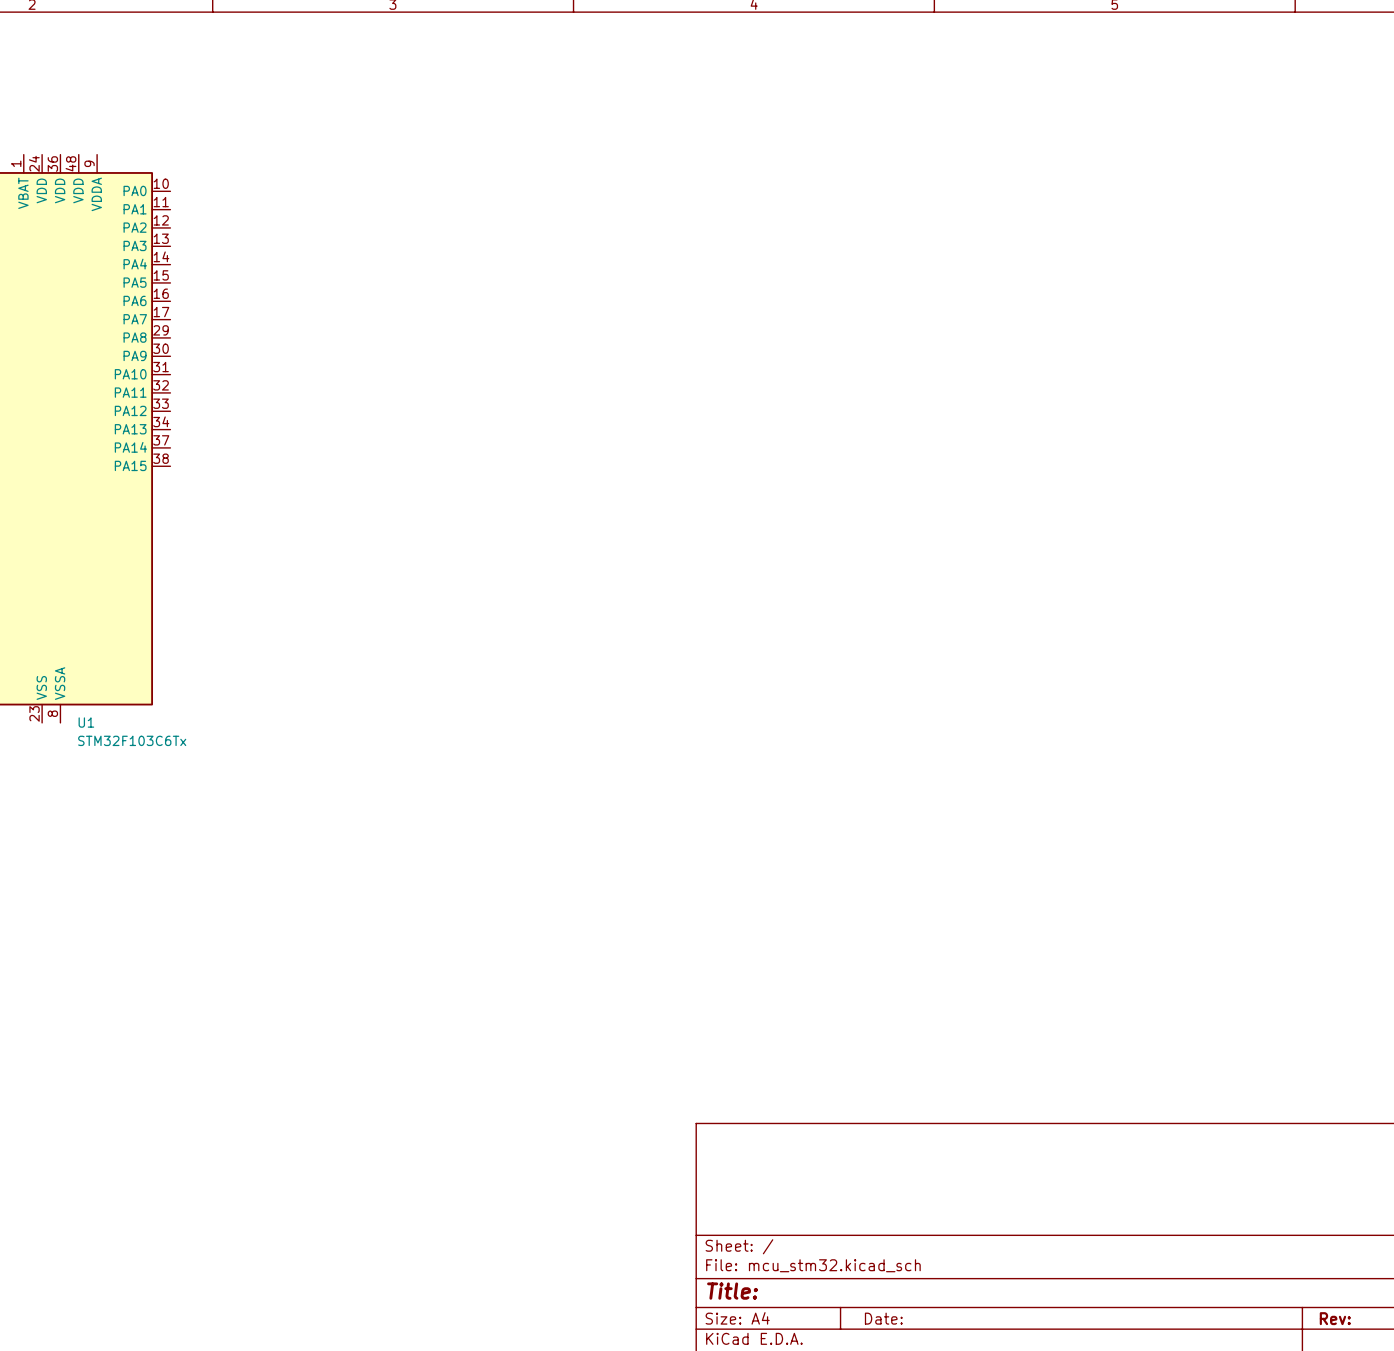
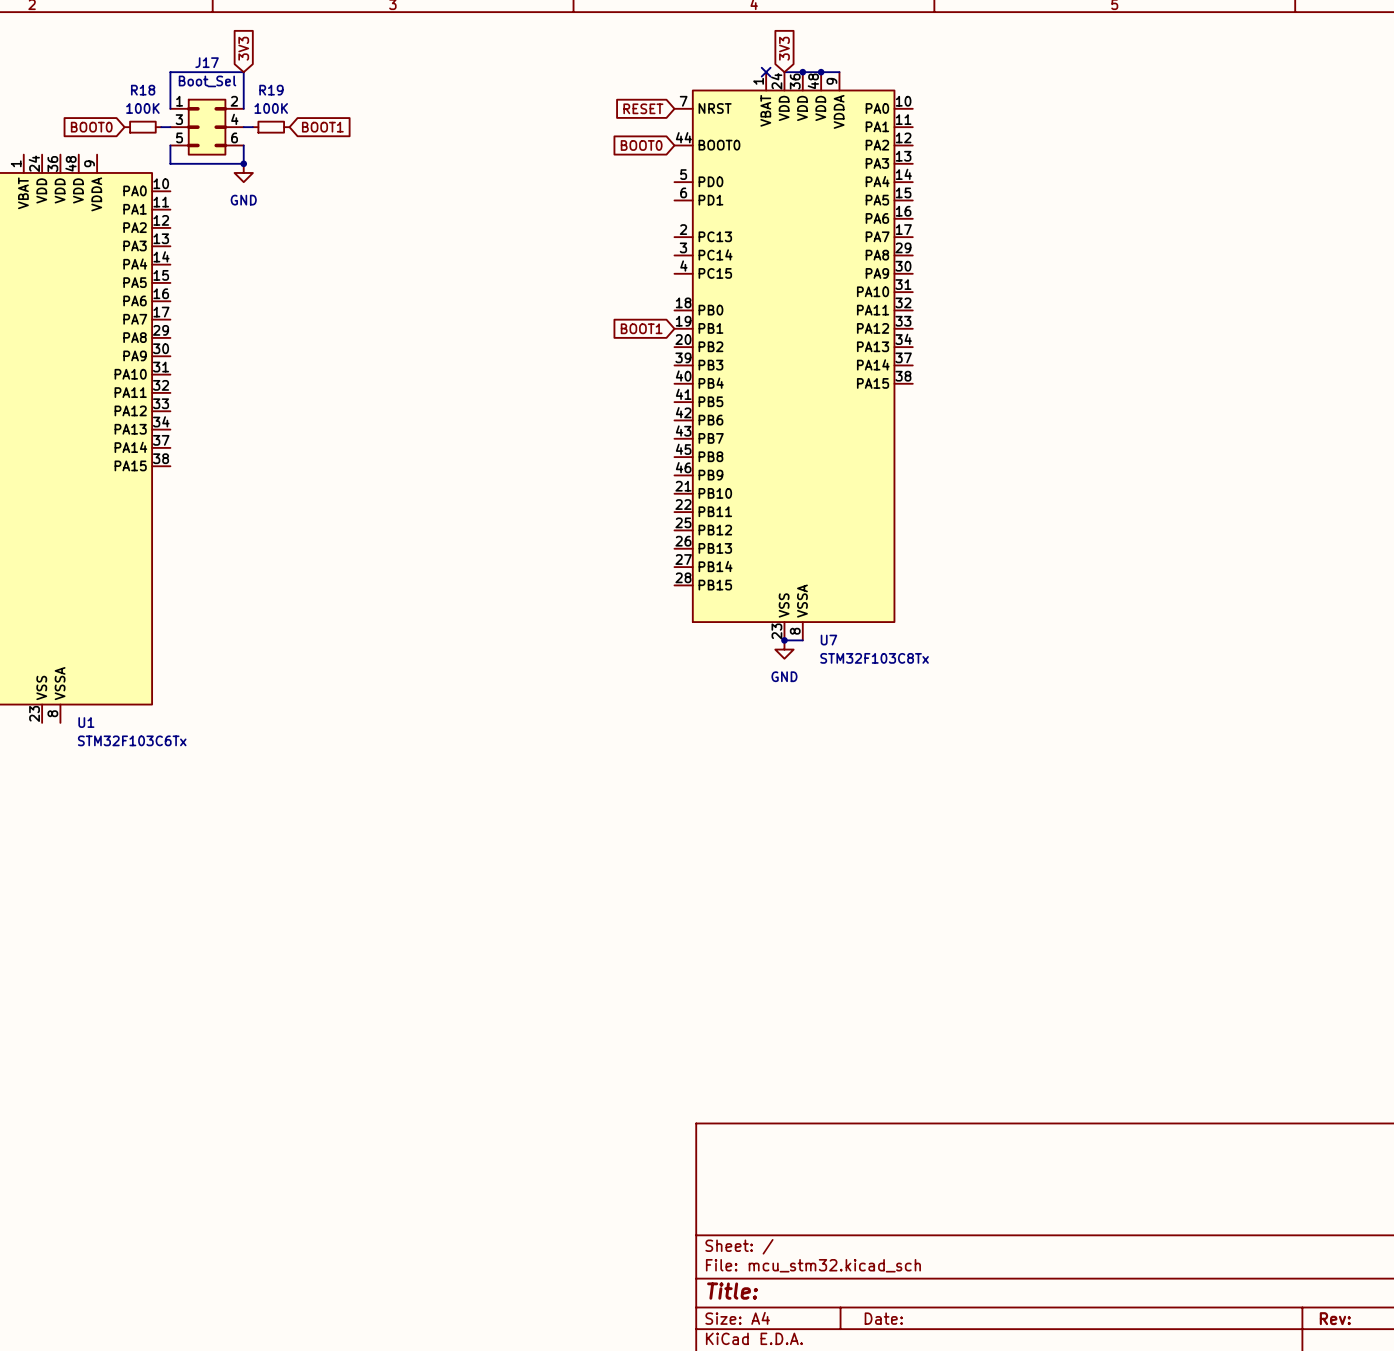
global label: none -> 3V3 (243, 48)
global label: none -> 3V3 (784, 48)
no-connect mark: none -> (766, 72)
wire: none -> (784, 72) (839, 72)
junction: none -> (802, 72)
junction: none -> (821, 72)
wire: none -> (170, 108) (170, 72) (243, 72) (243, 108)
global label: none -> RESET (643, 108)
global label: none -> BOOT0 (91, 127)
R18: none -> 100K (142, 127)
wire: none -> (161, 127) (170, 127)
J17: none -> Boot_Sel (207, 127)
wire: none -> (243, 127) (252, 127)
R19: none -> 100K (271, 127)
global label: none -> BOOT1 (322, 127)
wire: none -> (170, 145) (170, 163) (243, 163) (243, 145)
global label: none -> BOOT0 (641, 145)
junction: none -> (243, 163)
power symbol: none -> GND (243, 172)
global label: none -> BOOT1 (641, 328)
U7: none -> STM32F103C8Tx (793, 356)
wire: none -> (784, 640) (802, 640)
junction: none -> (784, 640)
power symbol: none -> GND (784, 649)

